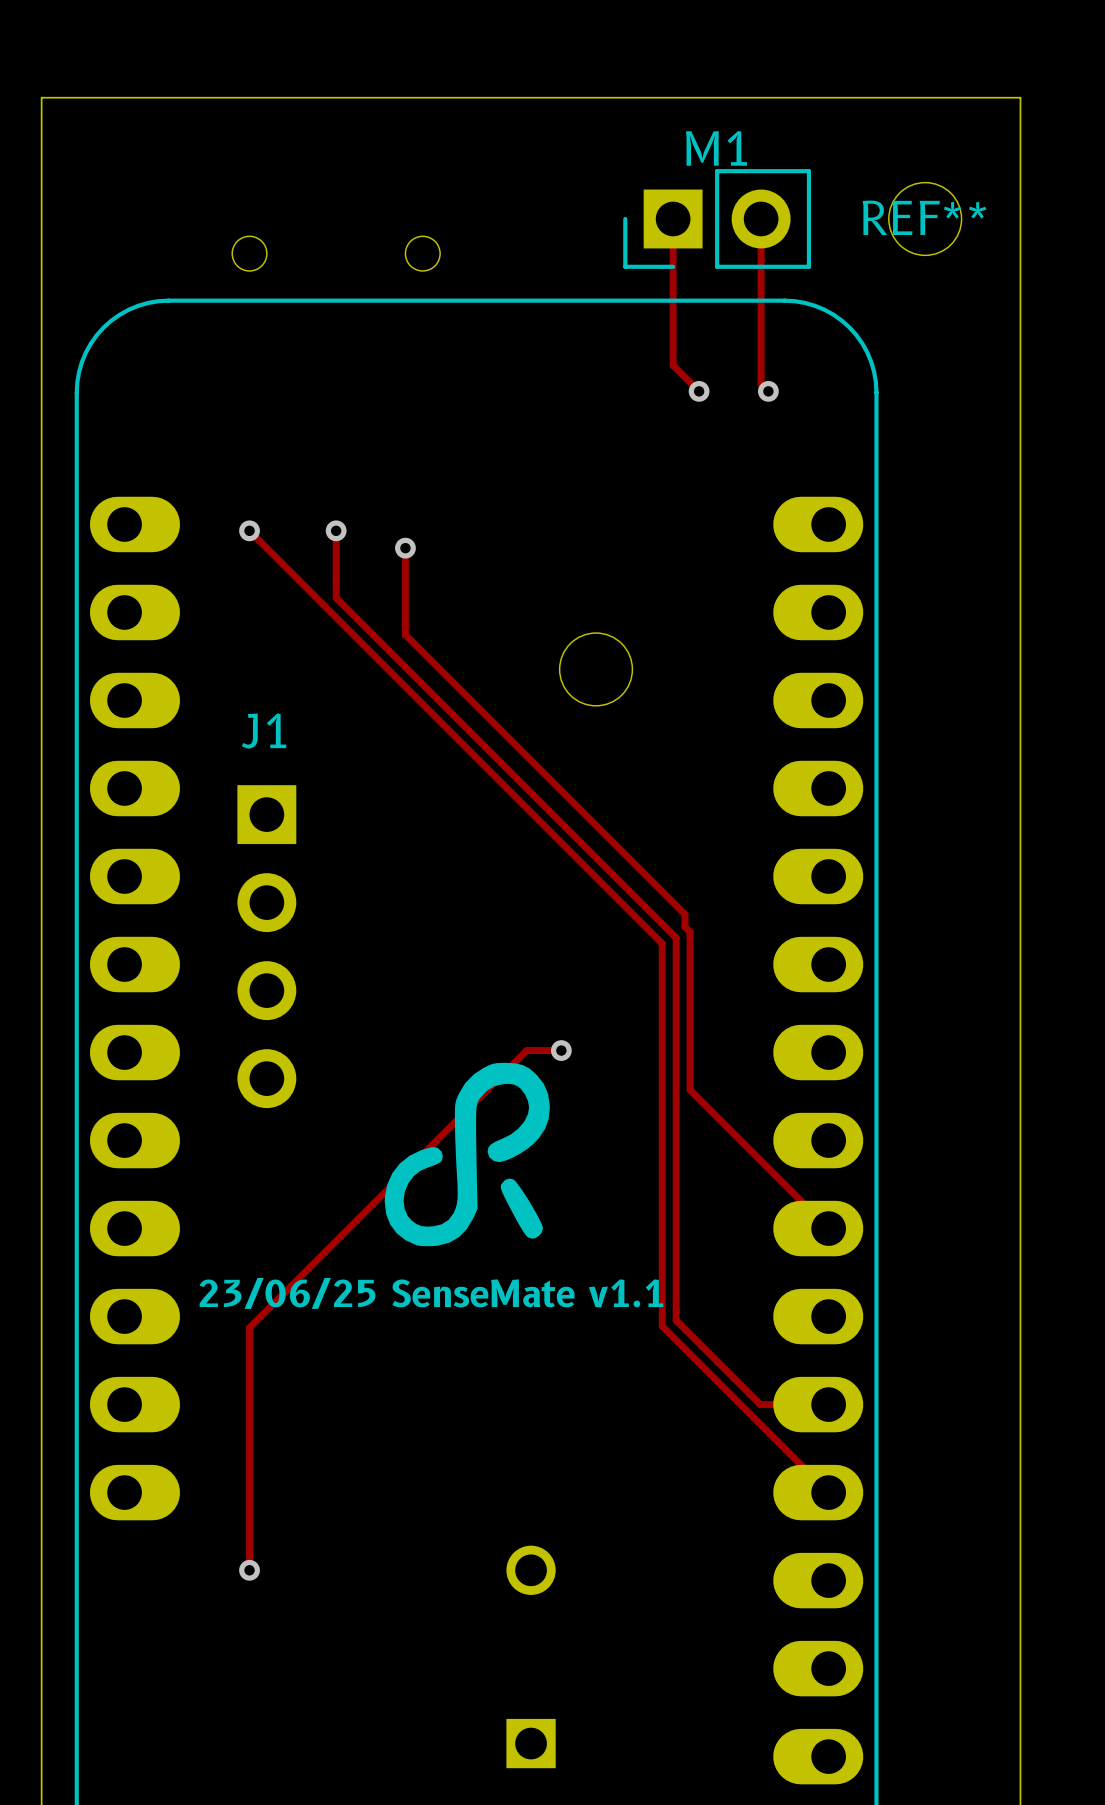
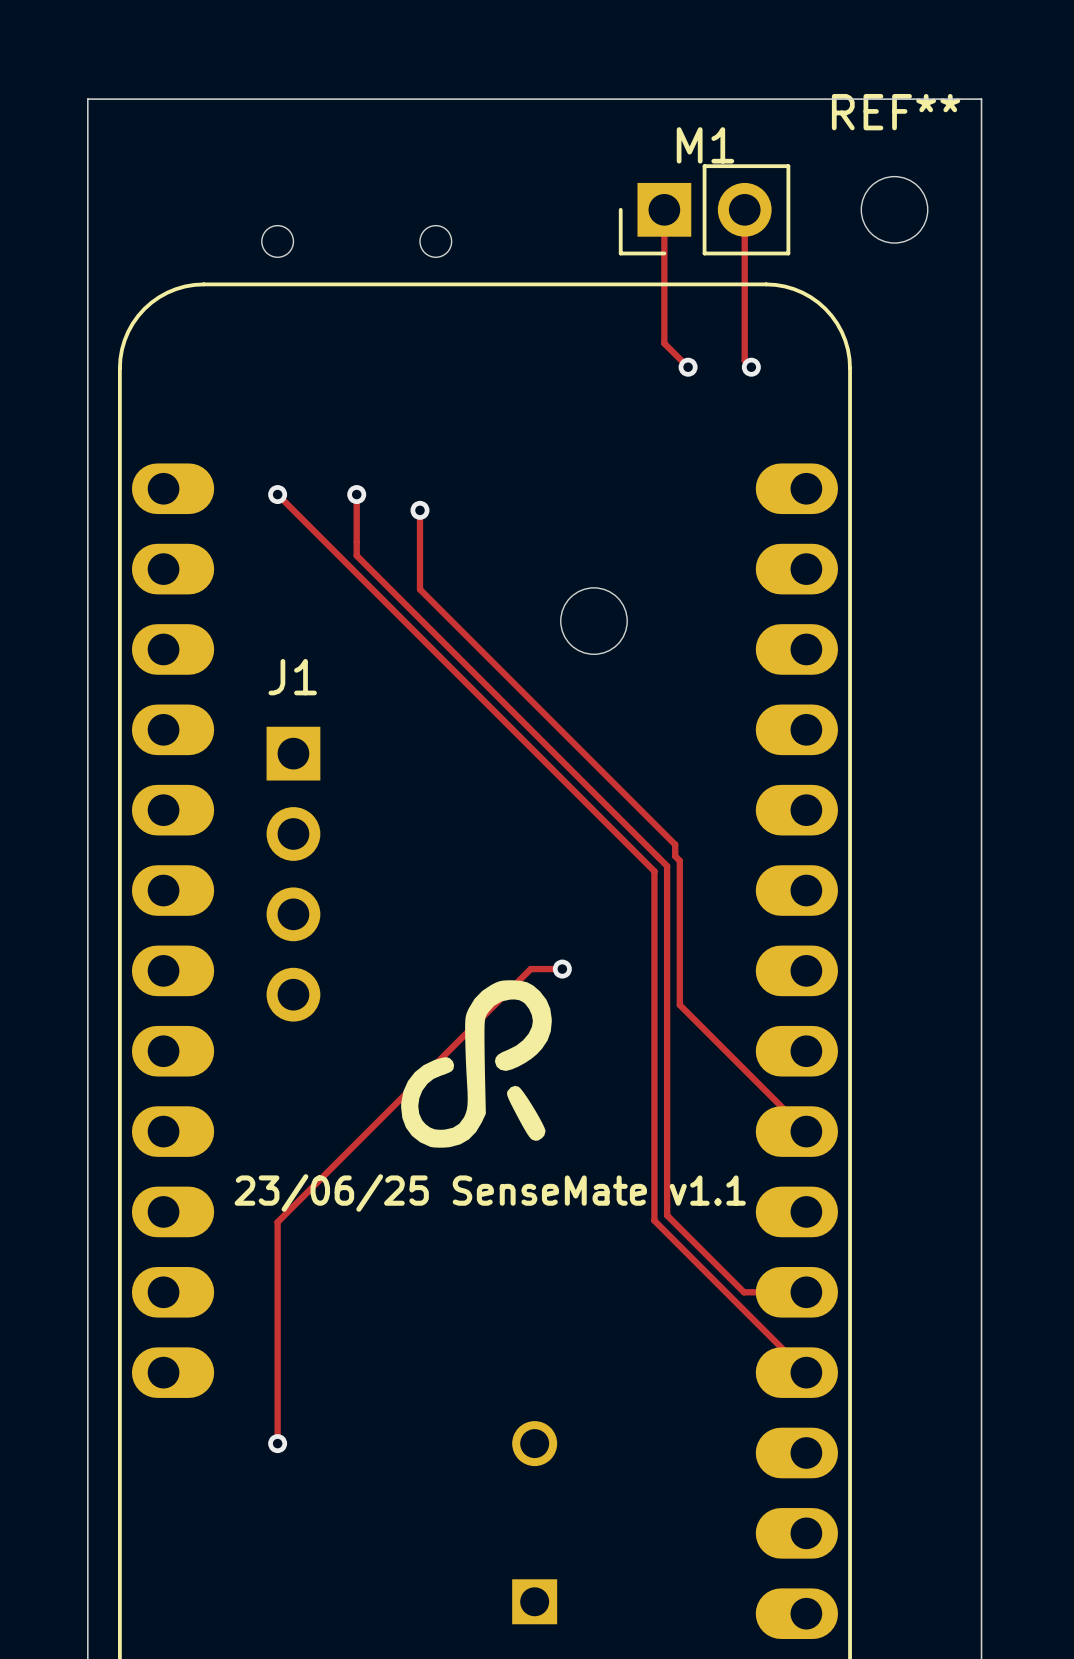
REF** name position: REF** (924, 217) -> REF** (896, 112)

